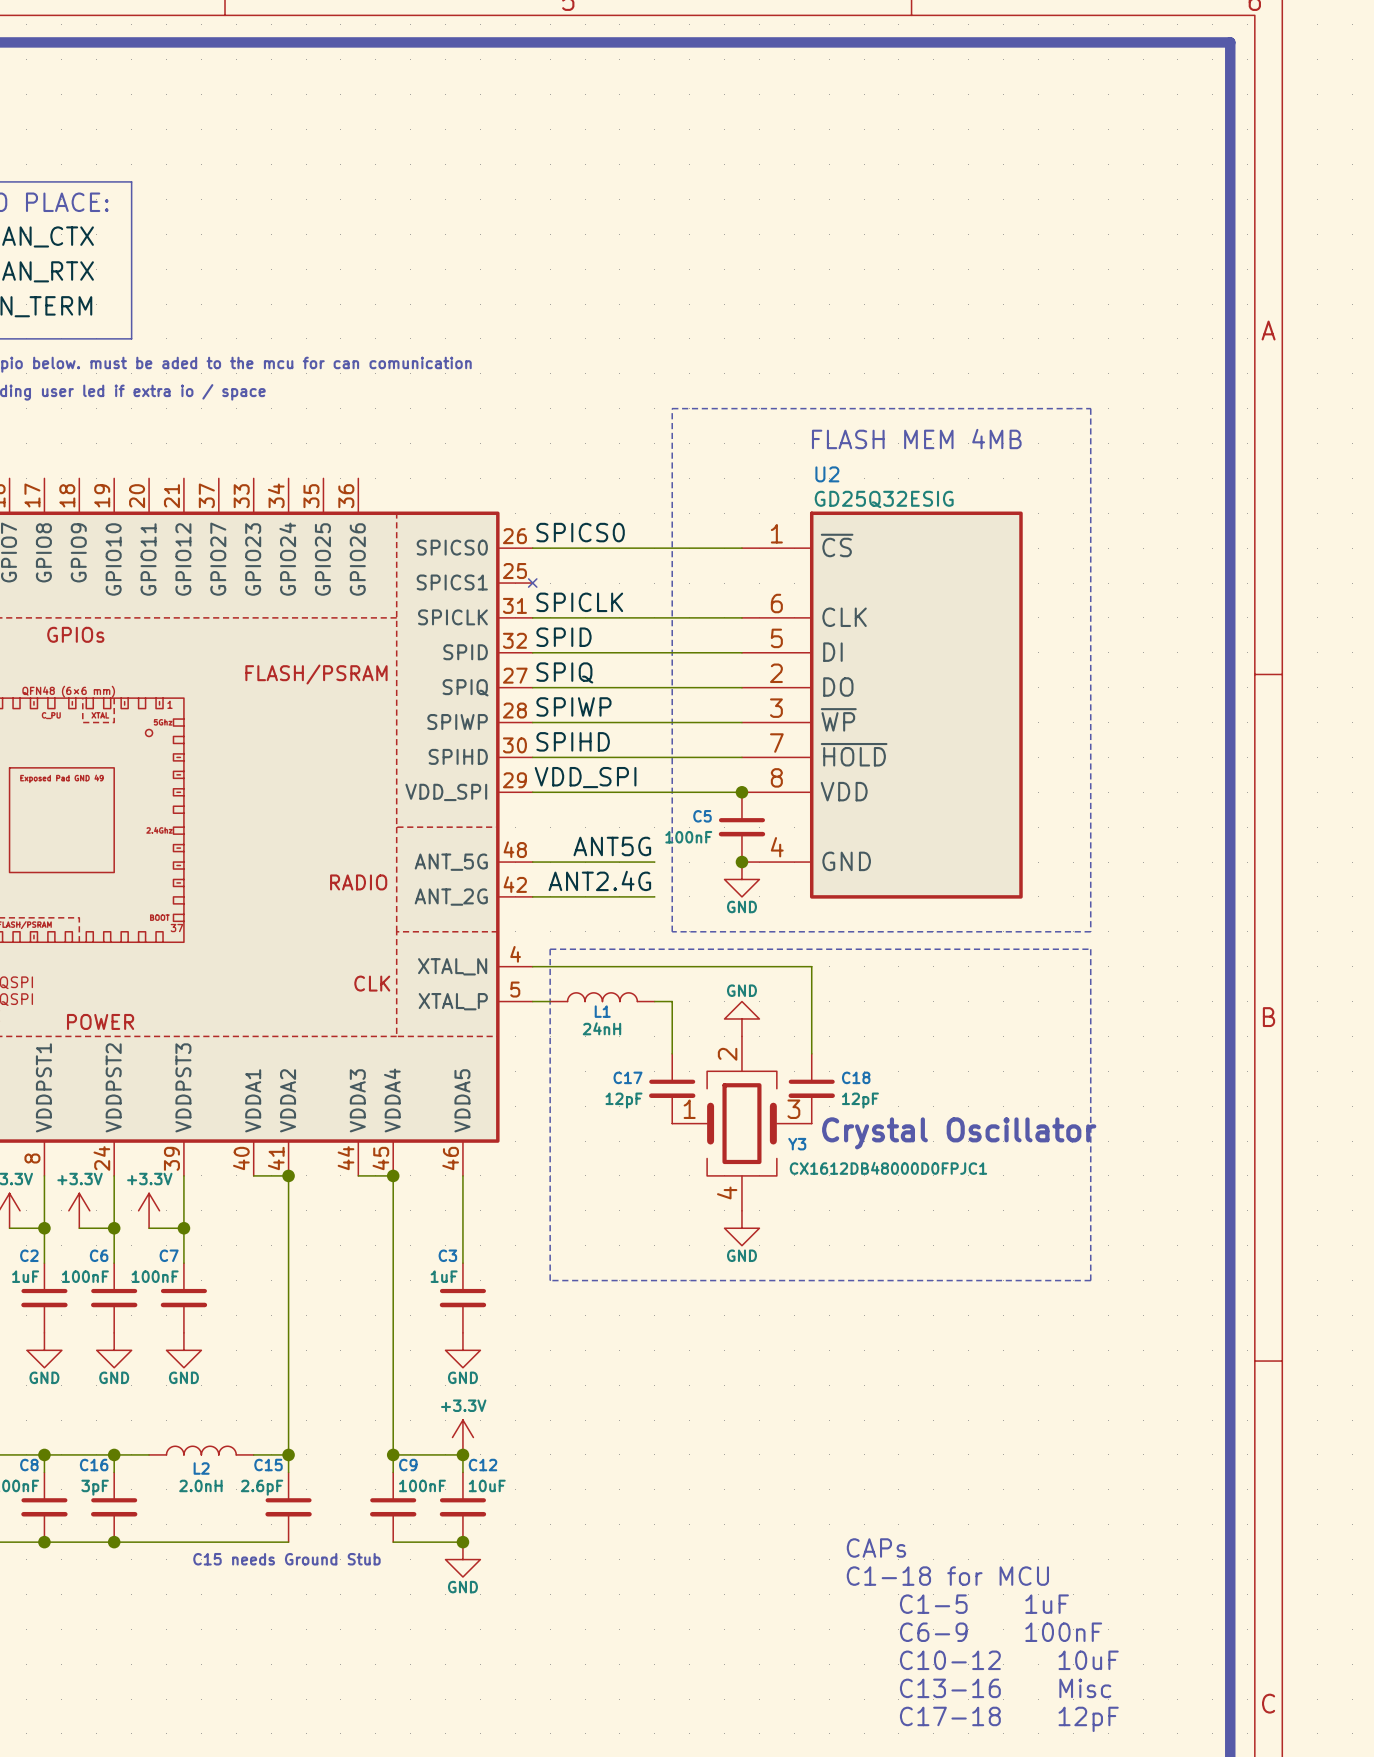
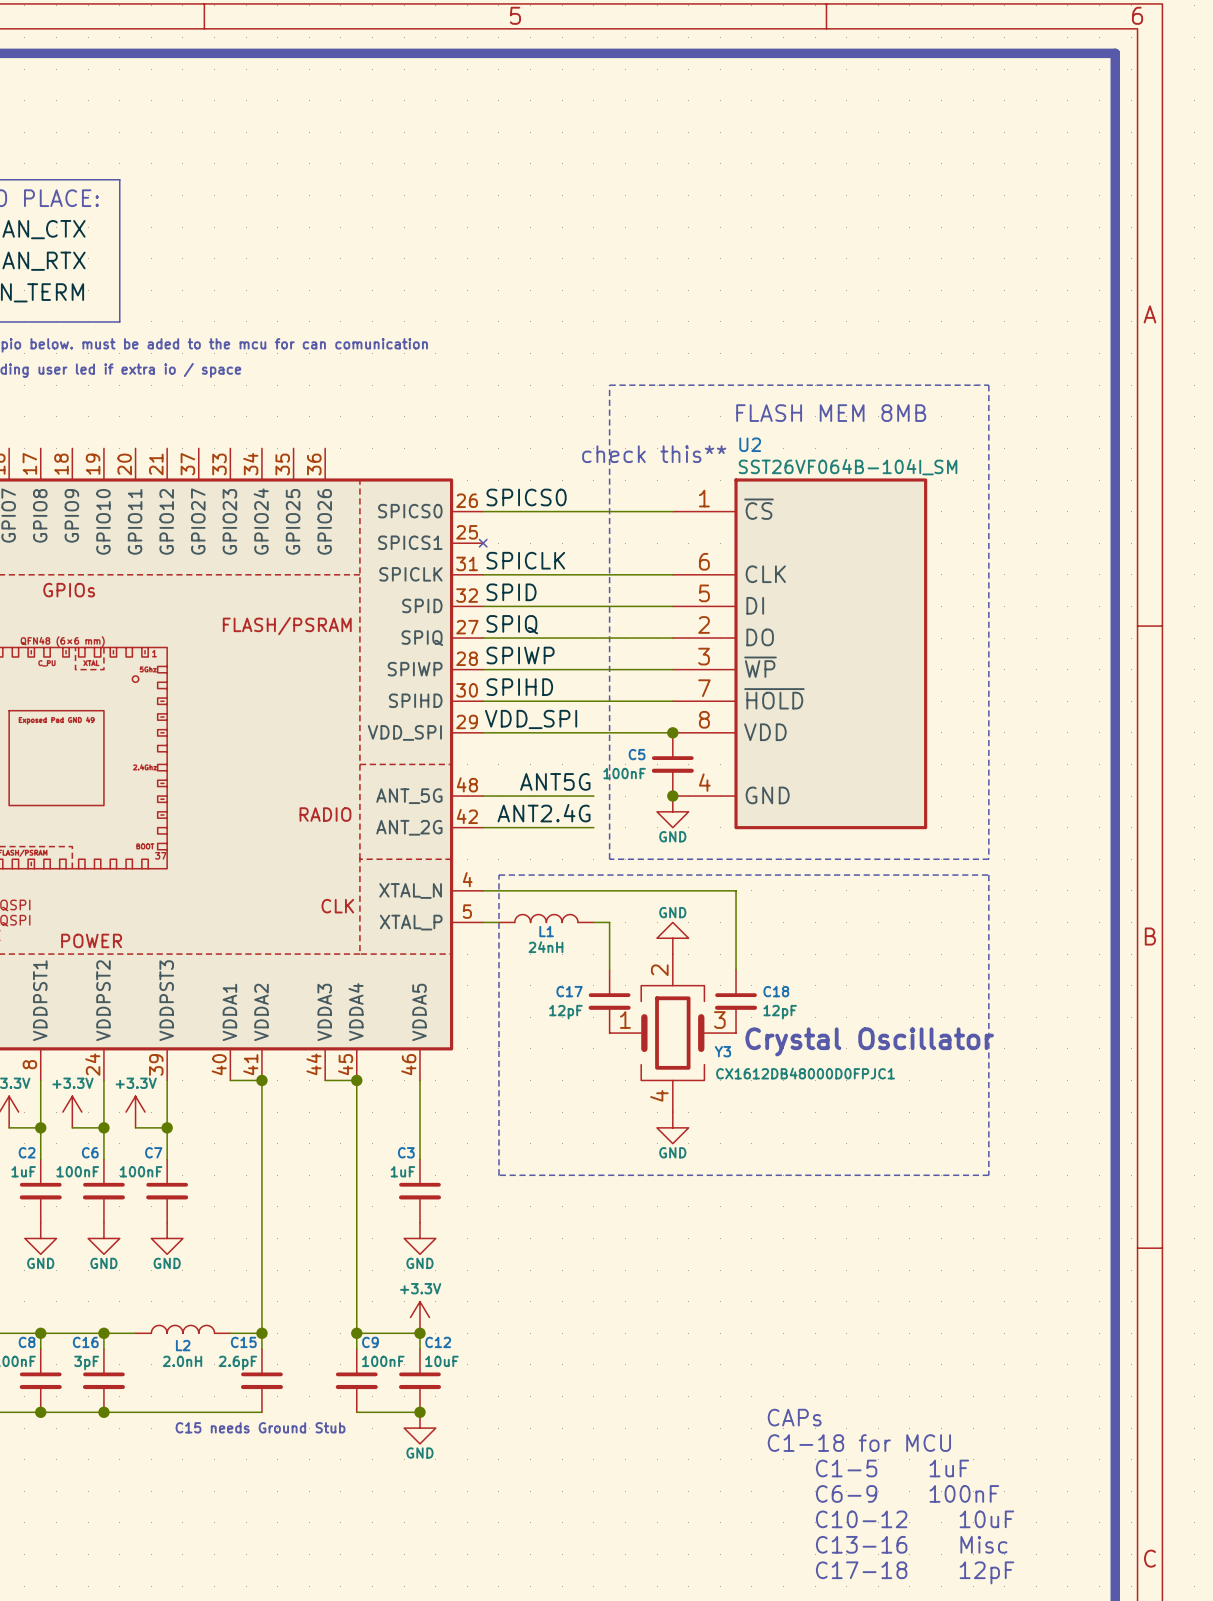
text: FLASH MEM 4MB (916, 439) -> FLASH MEM 8MB (831, 413)
text: none -> check this** (654, 454)
U2 value: GD25Q32ESIG (884, 499) -> SST26VF064B-104I_SM (848, 467)

